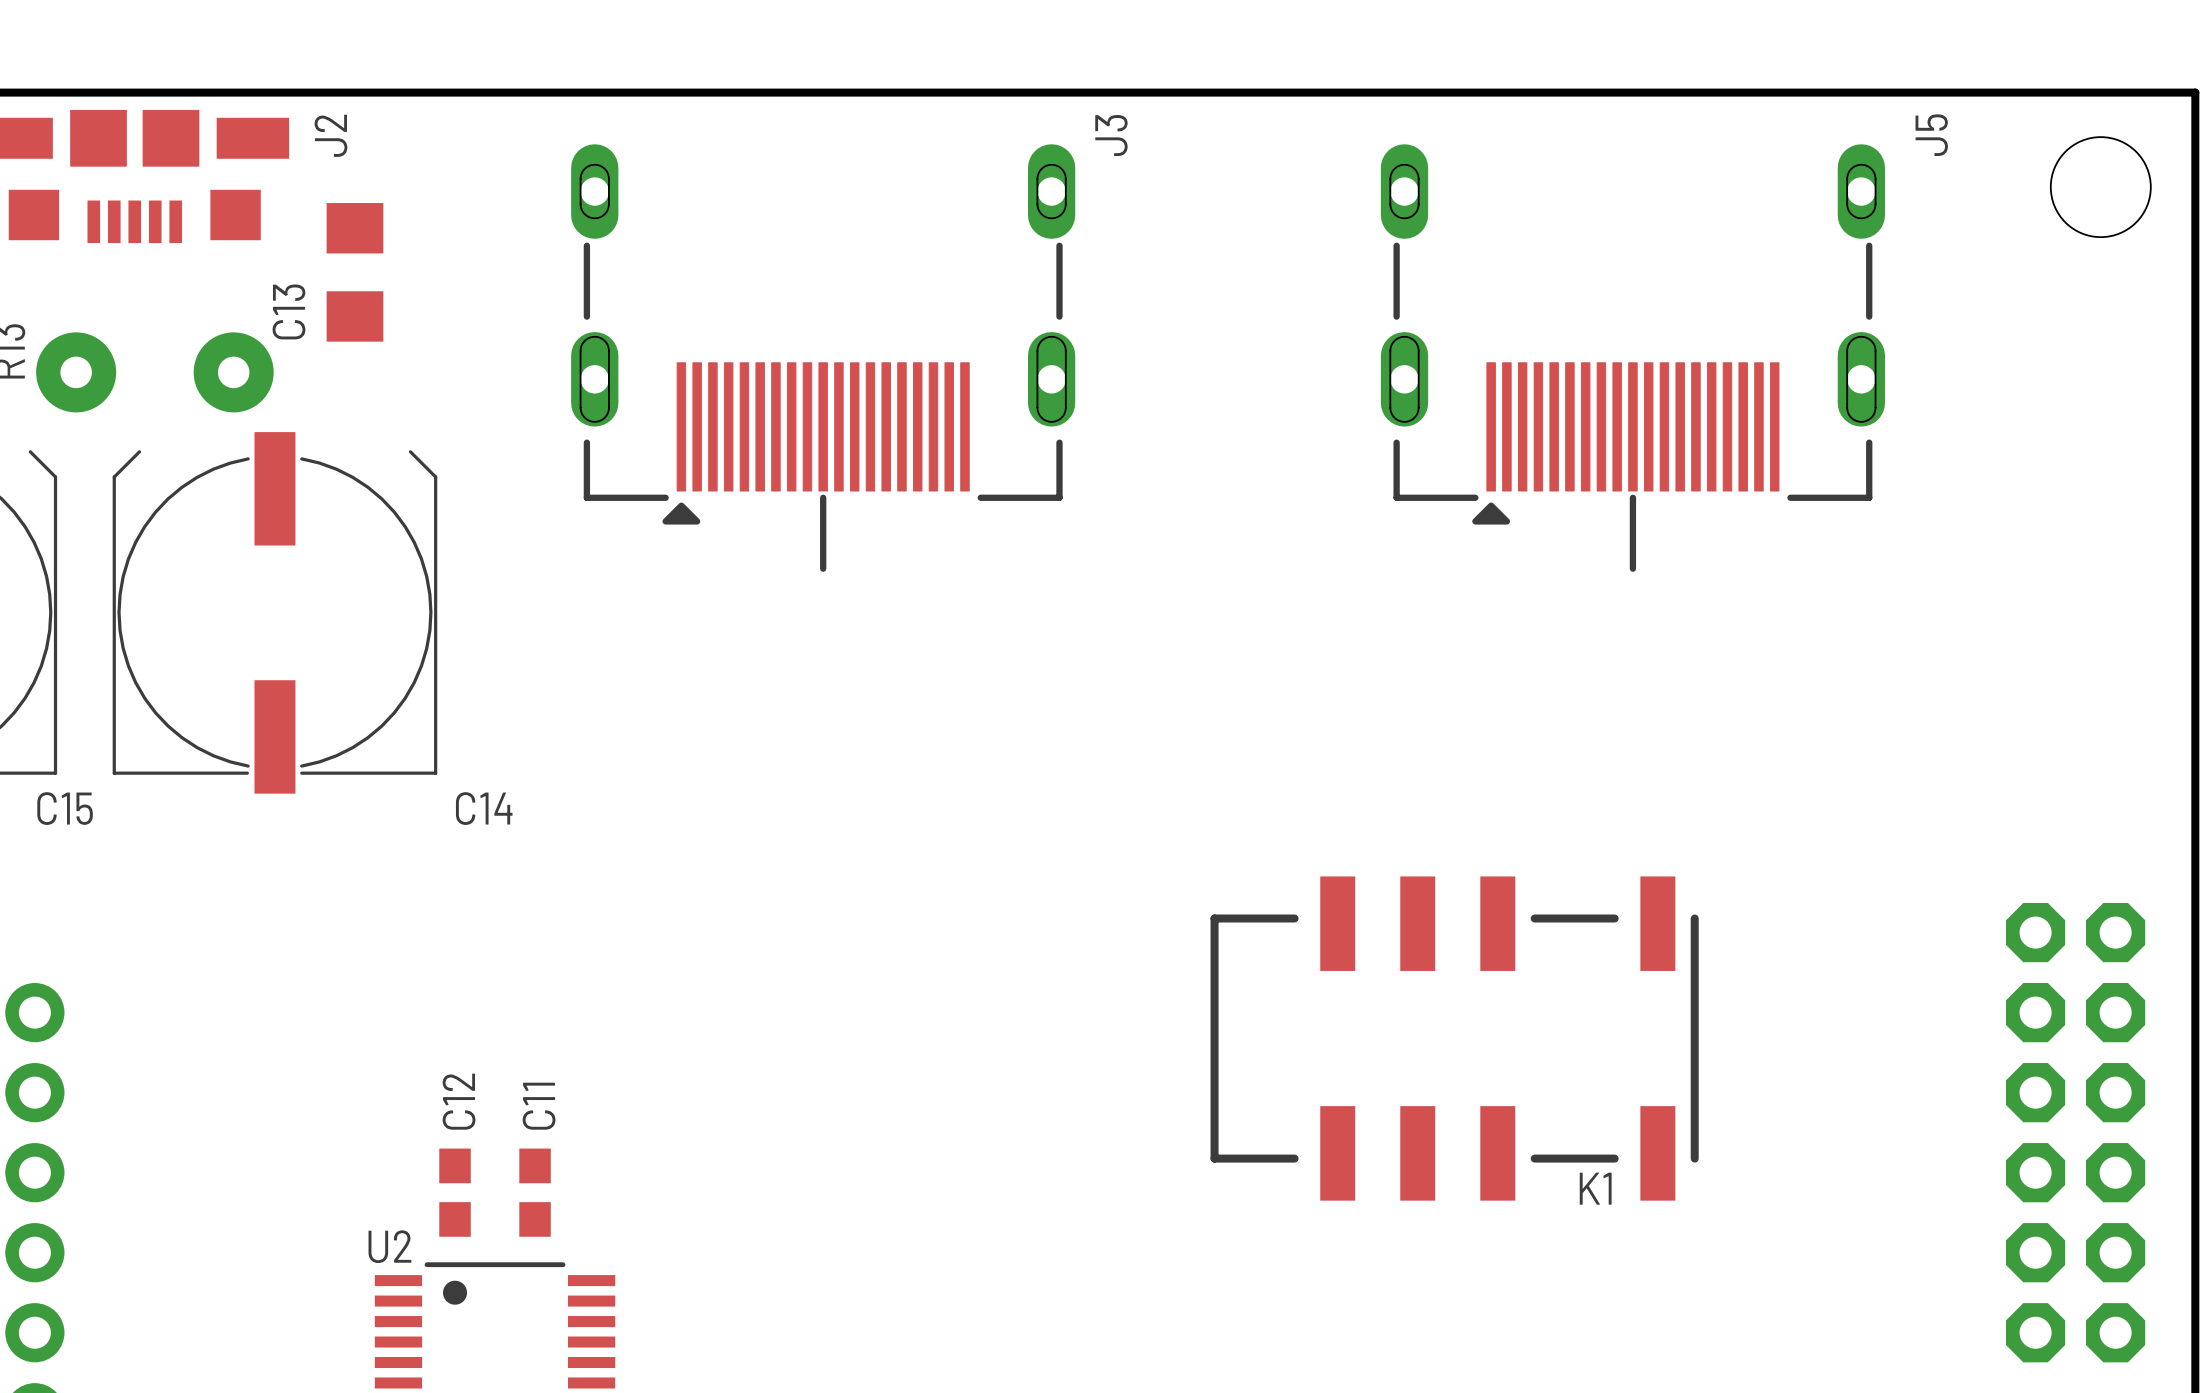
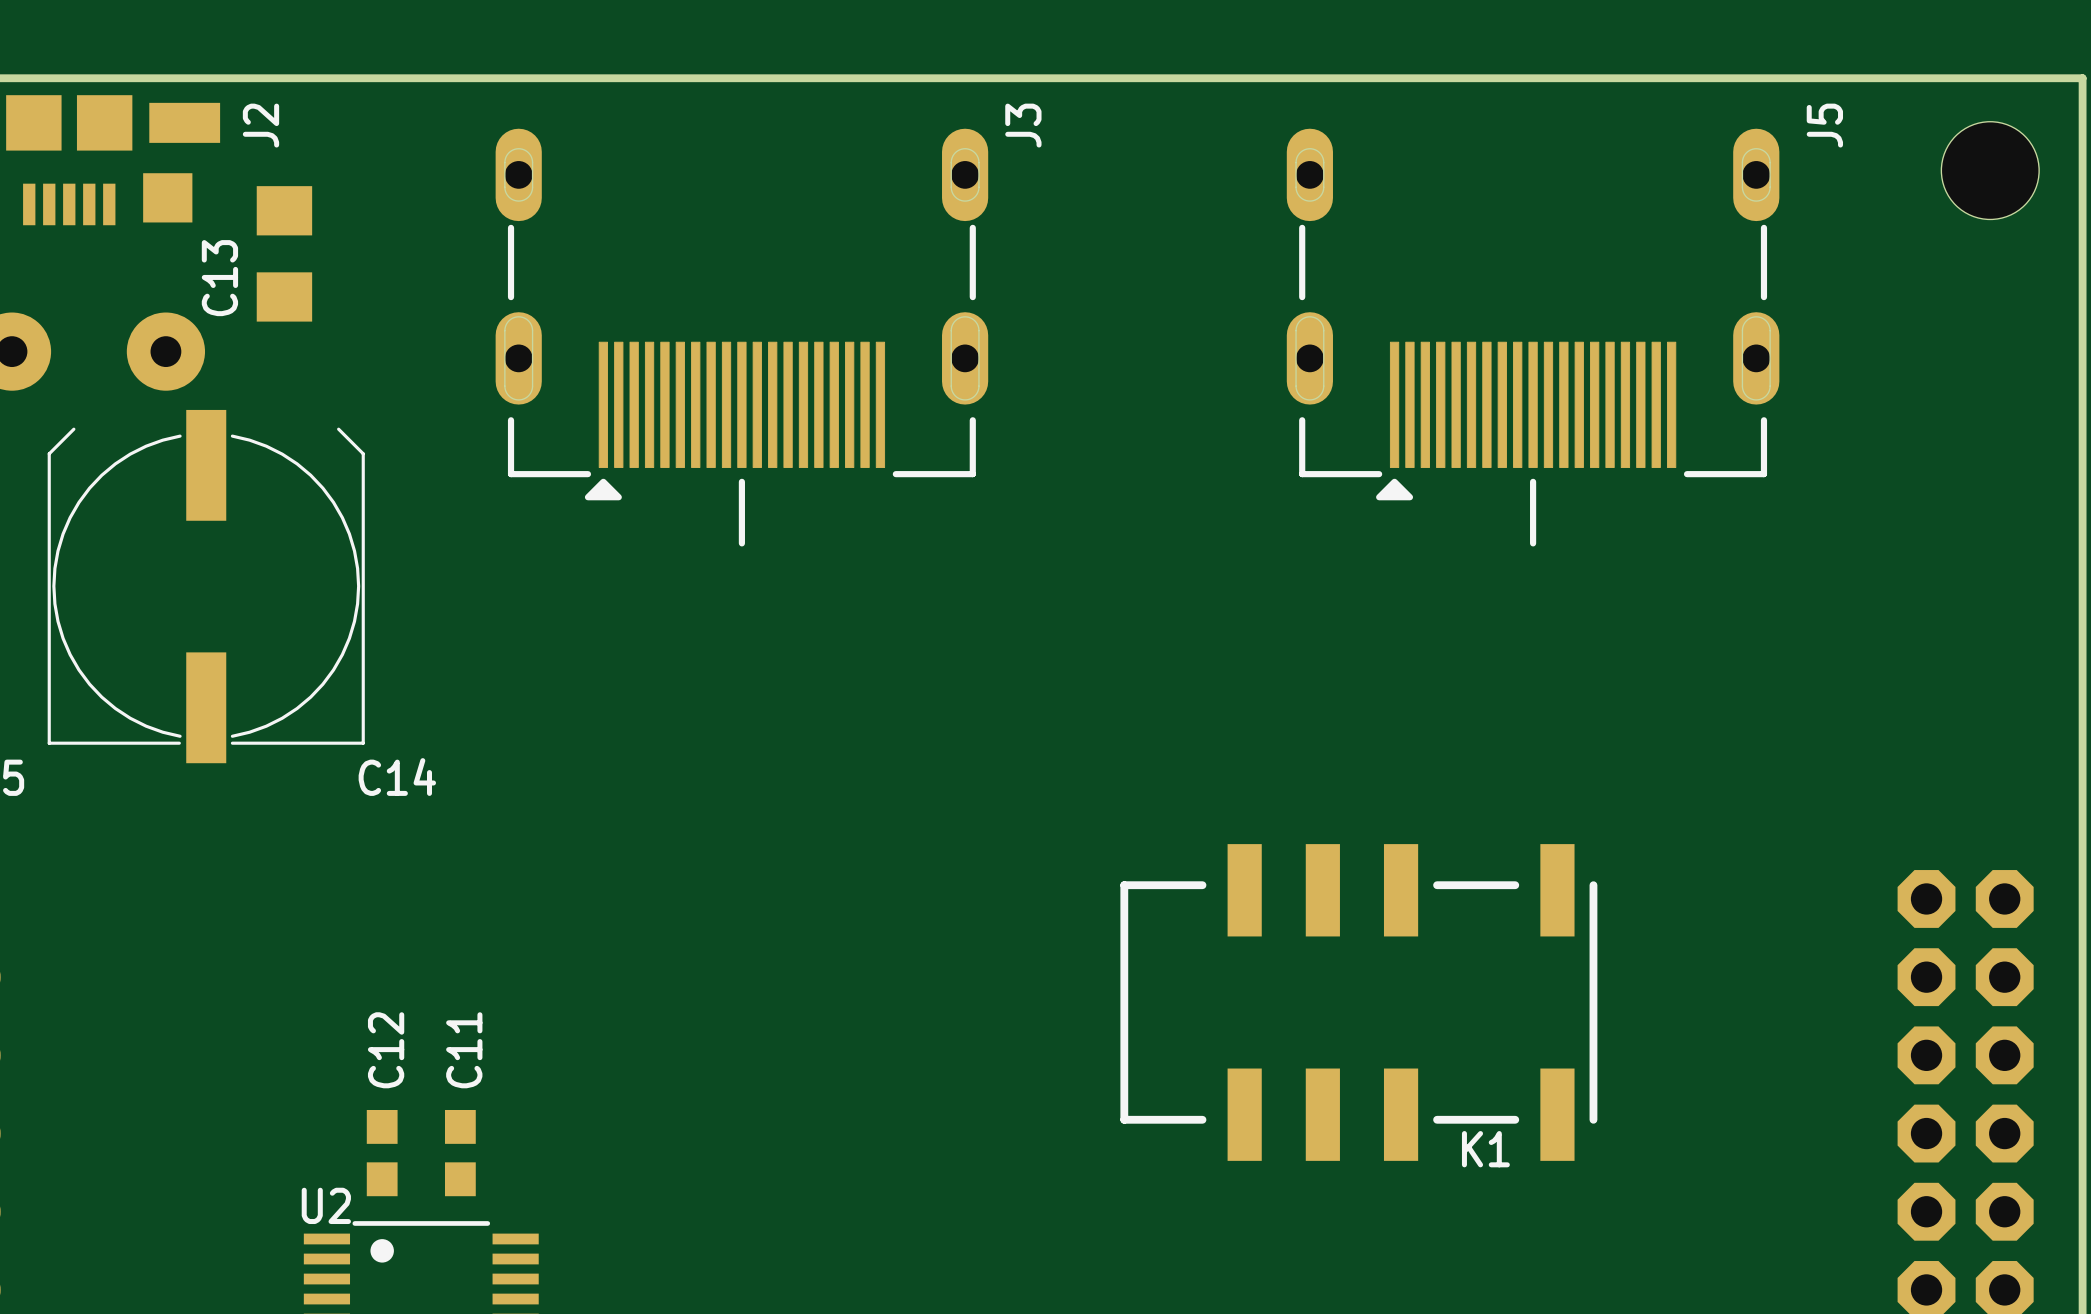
J3 footprint: [571, 144, 1076, 572] -> [495, 128, 989, 547]
J5 footprint: [1380, 144, 1885, 572] -> [1286, 128, 1780, 547]

